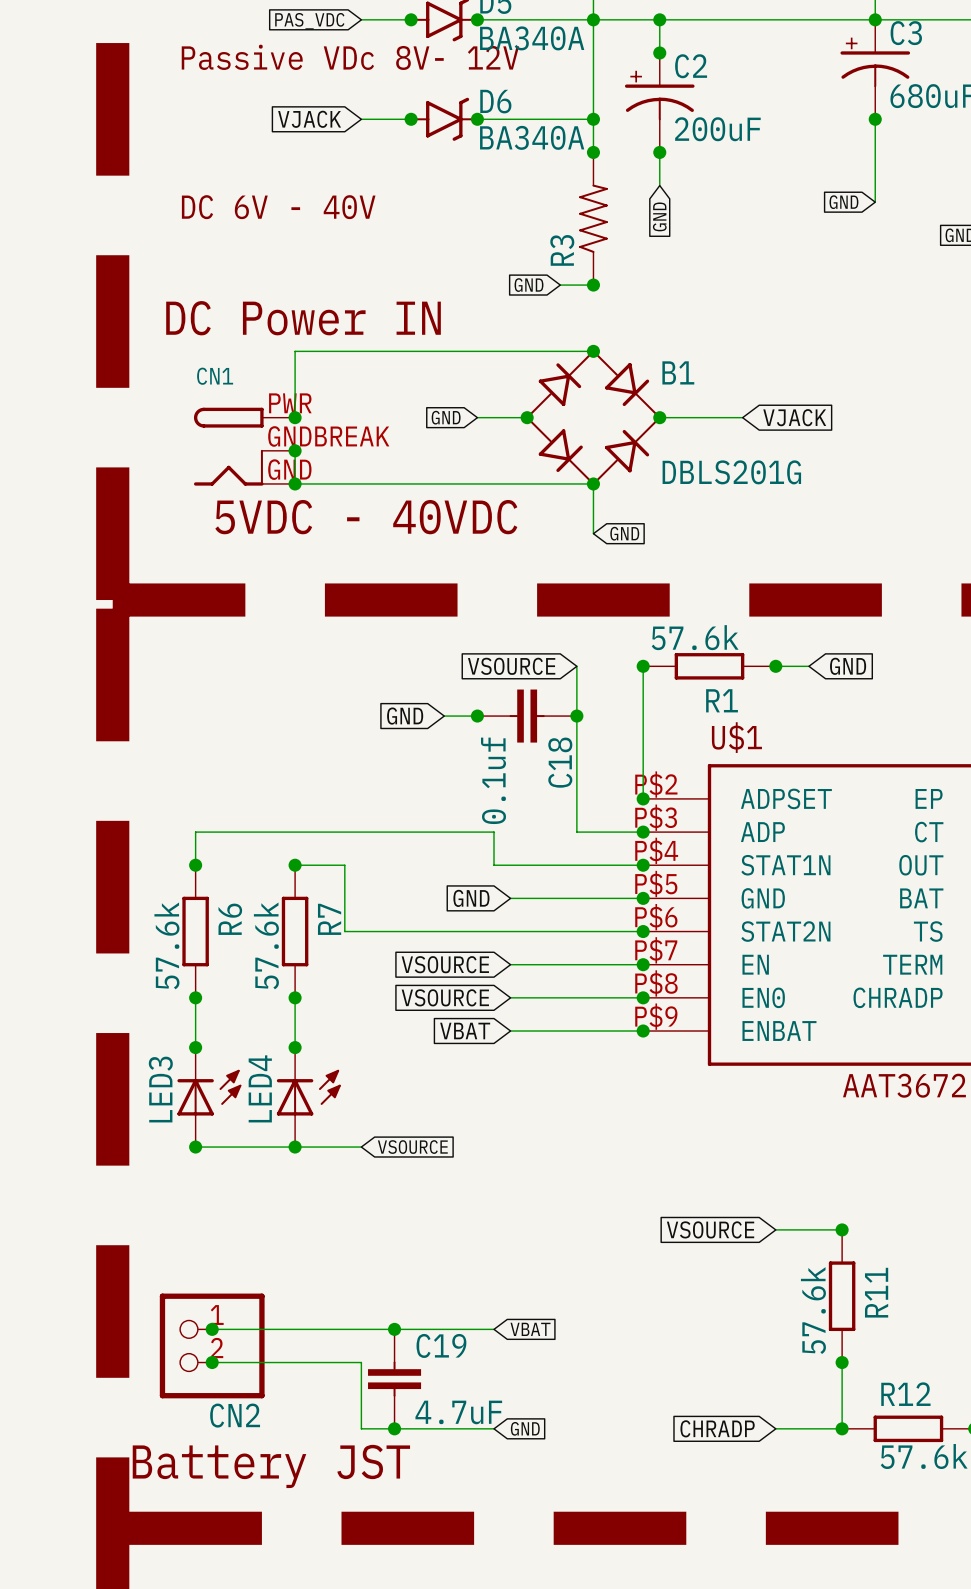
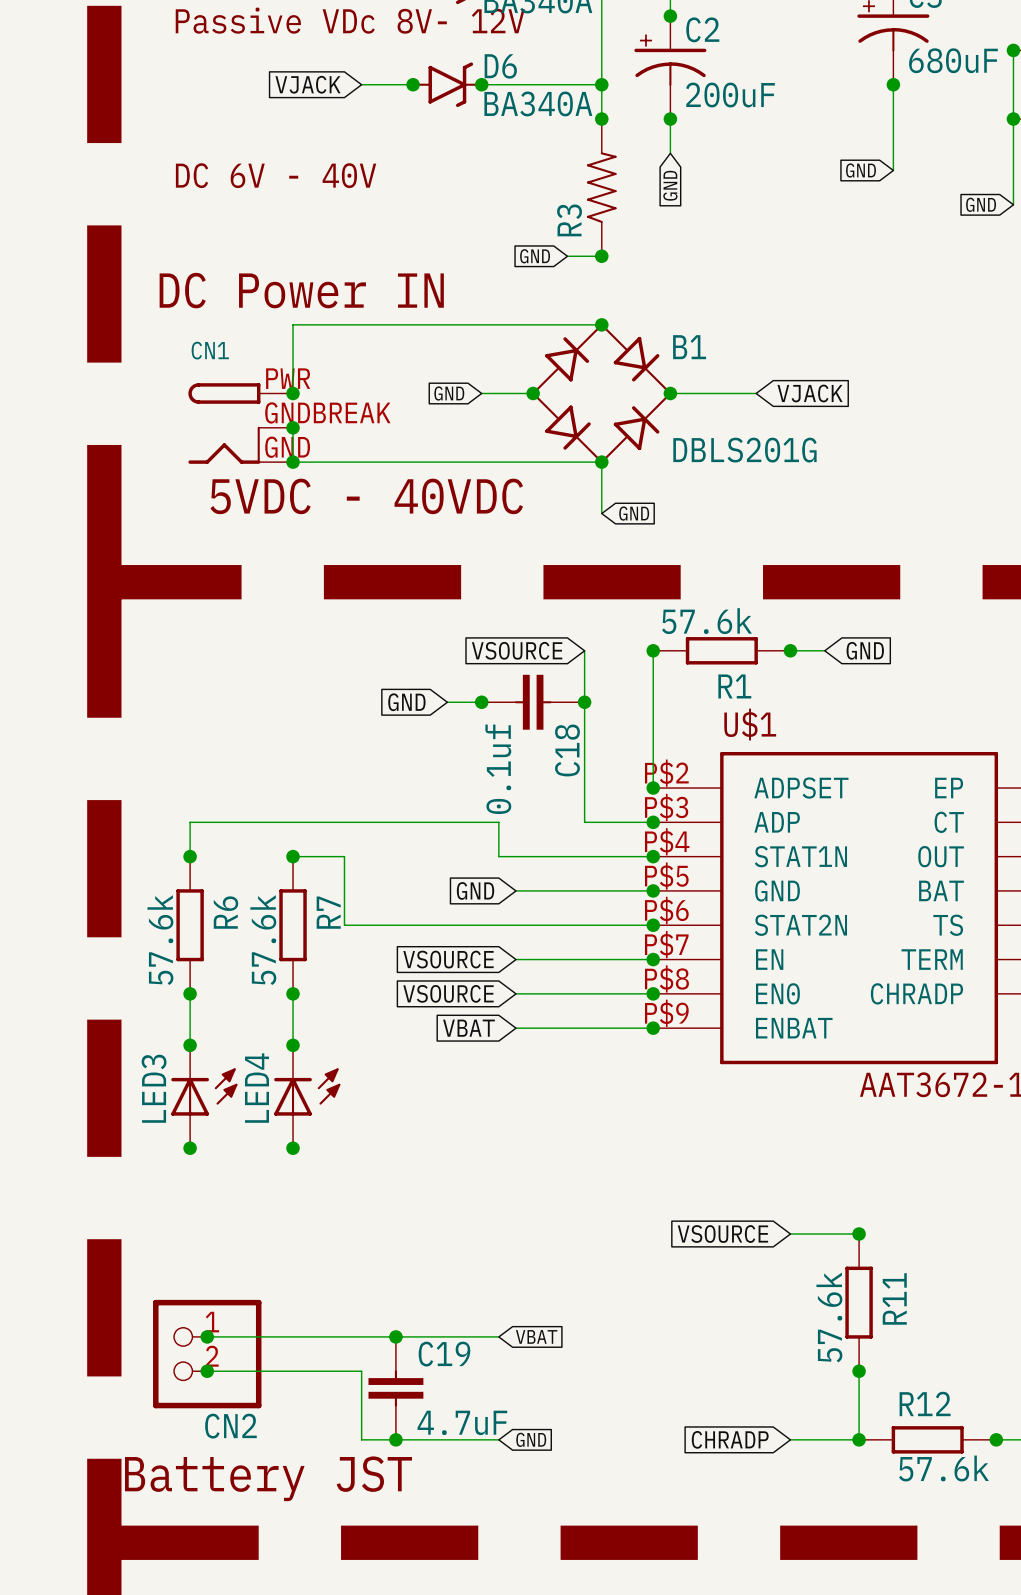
wire: (195, 1147) (361, 1147) -> none
global label: VSOURCE (412, 1147) -> none

